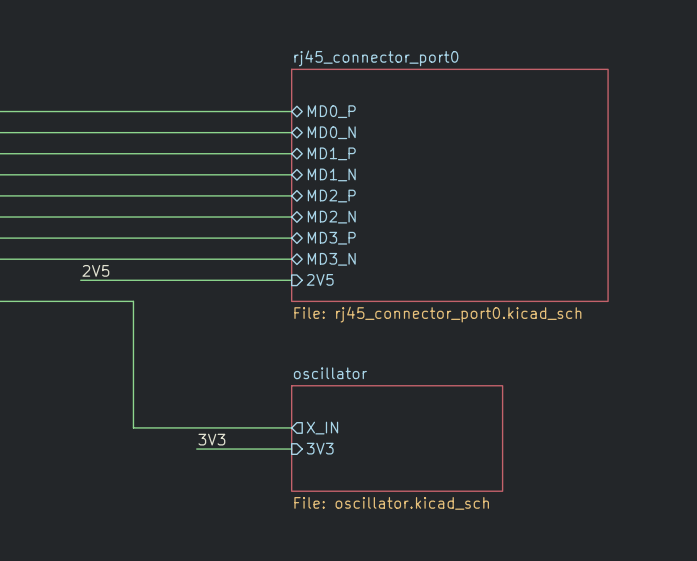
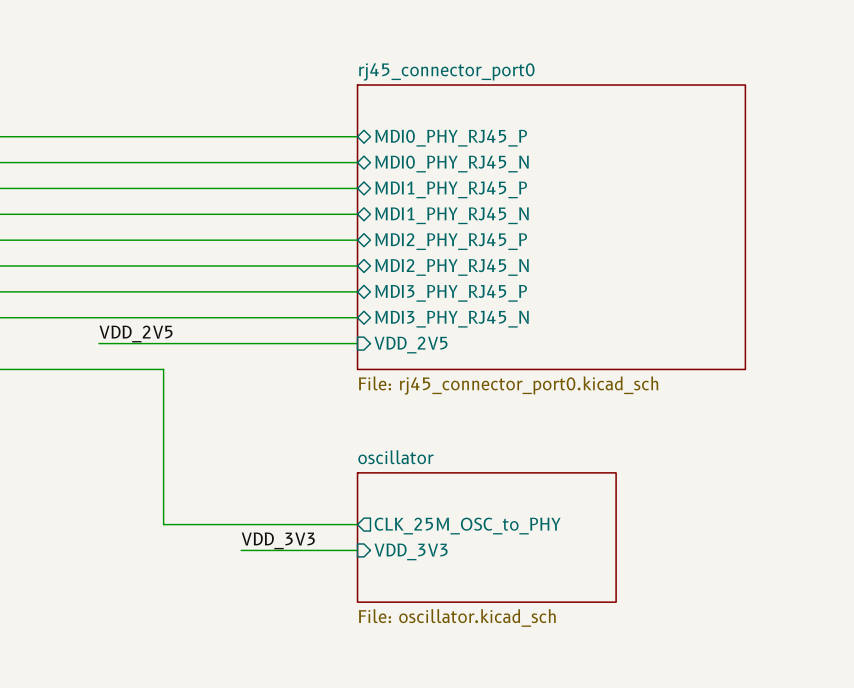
sheet pin: MD0_P (331, 111) -> MDI0_PHY_RJ45_P (451, 138)
sheet pin: MD0_N (331, 132) -> MDI0_PHY_RJ45_N (452, 164)
sheet pin: MD1_P (331, 153) -> MDI1_PHY_RJ45_P (451, 189)
sheet pin: MD1_N (331, 174) -> MDI1_PHY_RJ45_N (452, 215)
sheet pin: MD2_P (331, 196) -> MDI2_PHY_RJ45_P (451, 241)
sheet pin: MD2_N (331, 217) -> MDI2_PHY_RJ45_N (452, 267)
sheet pin: MD3_P (331, 238) -> MDI3_PHY_RJ45_P (451, 293)
sheet pin: MD3_N (331, 259) -> MDI3_PHY_RJ45_N (452, 319)
label: 2V5 (95, 270) -> VDD_2V5 (136, 333)
sheet pin: 2V5 (320, 279) -> VDD_2V5 (411, 345)
sheet pin: X_IN (322, 428) -> CLK_25M_OSC_to_PHY (467, 526)
label: 3V3 (211, 439) -> VDD_3V3 (278, 540)
sheet pin: 3V3 (320, 448) -> VDD_3V3 (411, 551)

